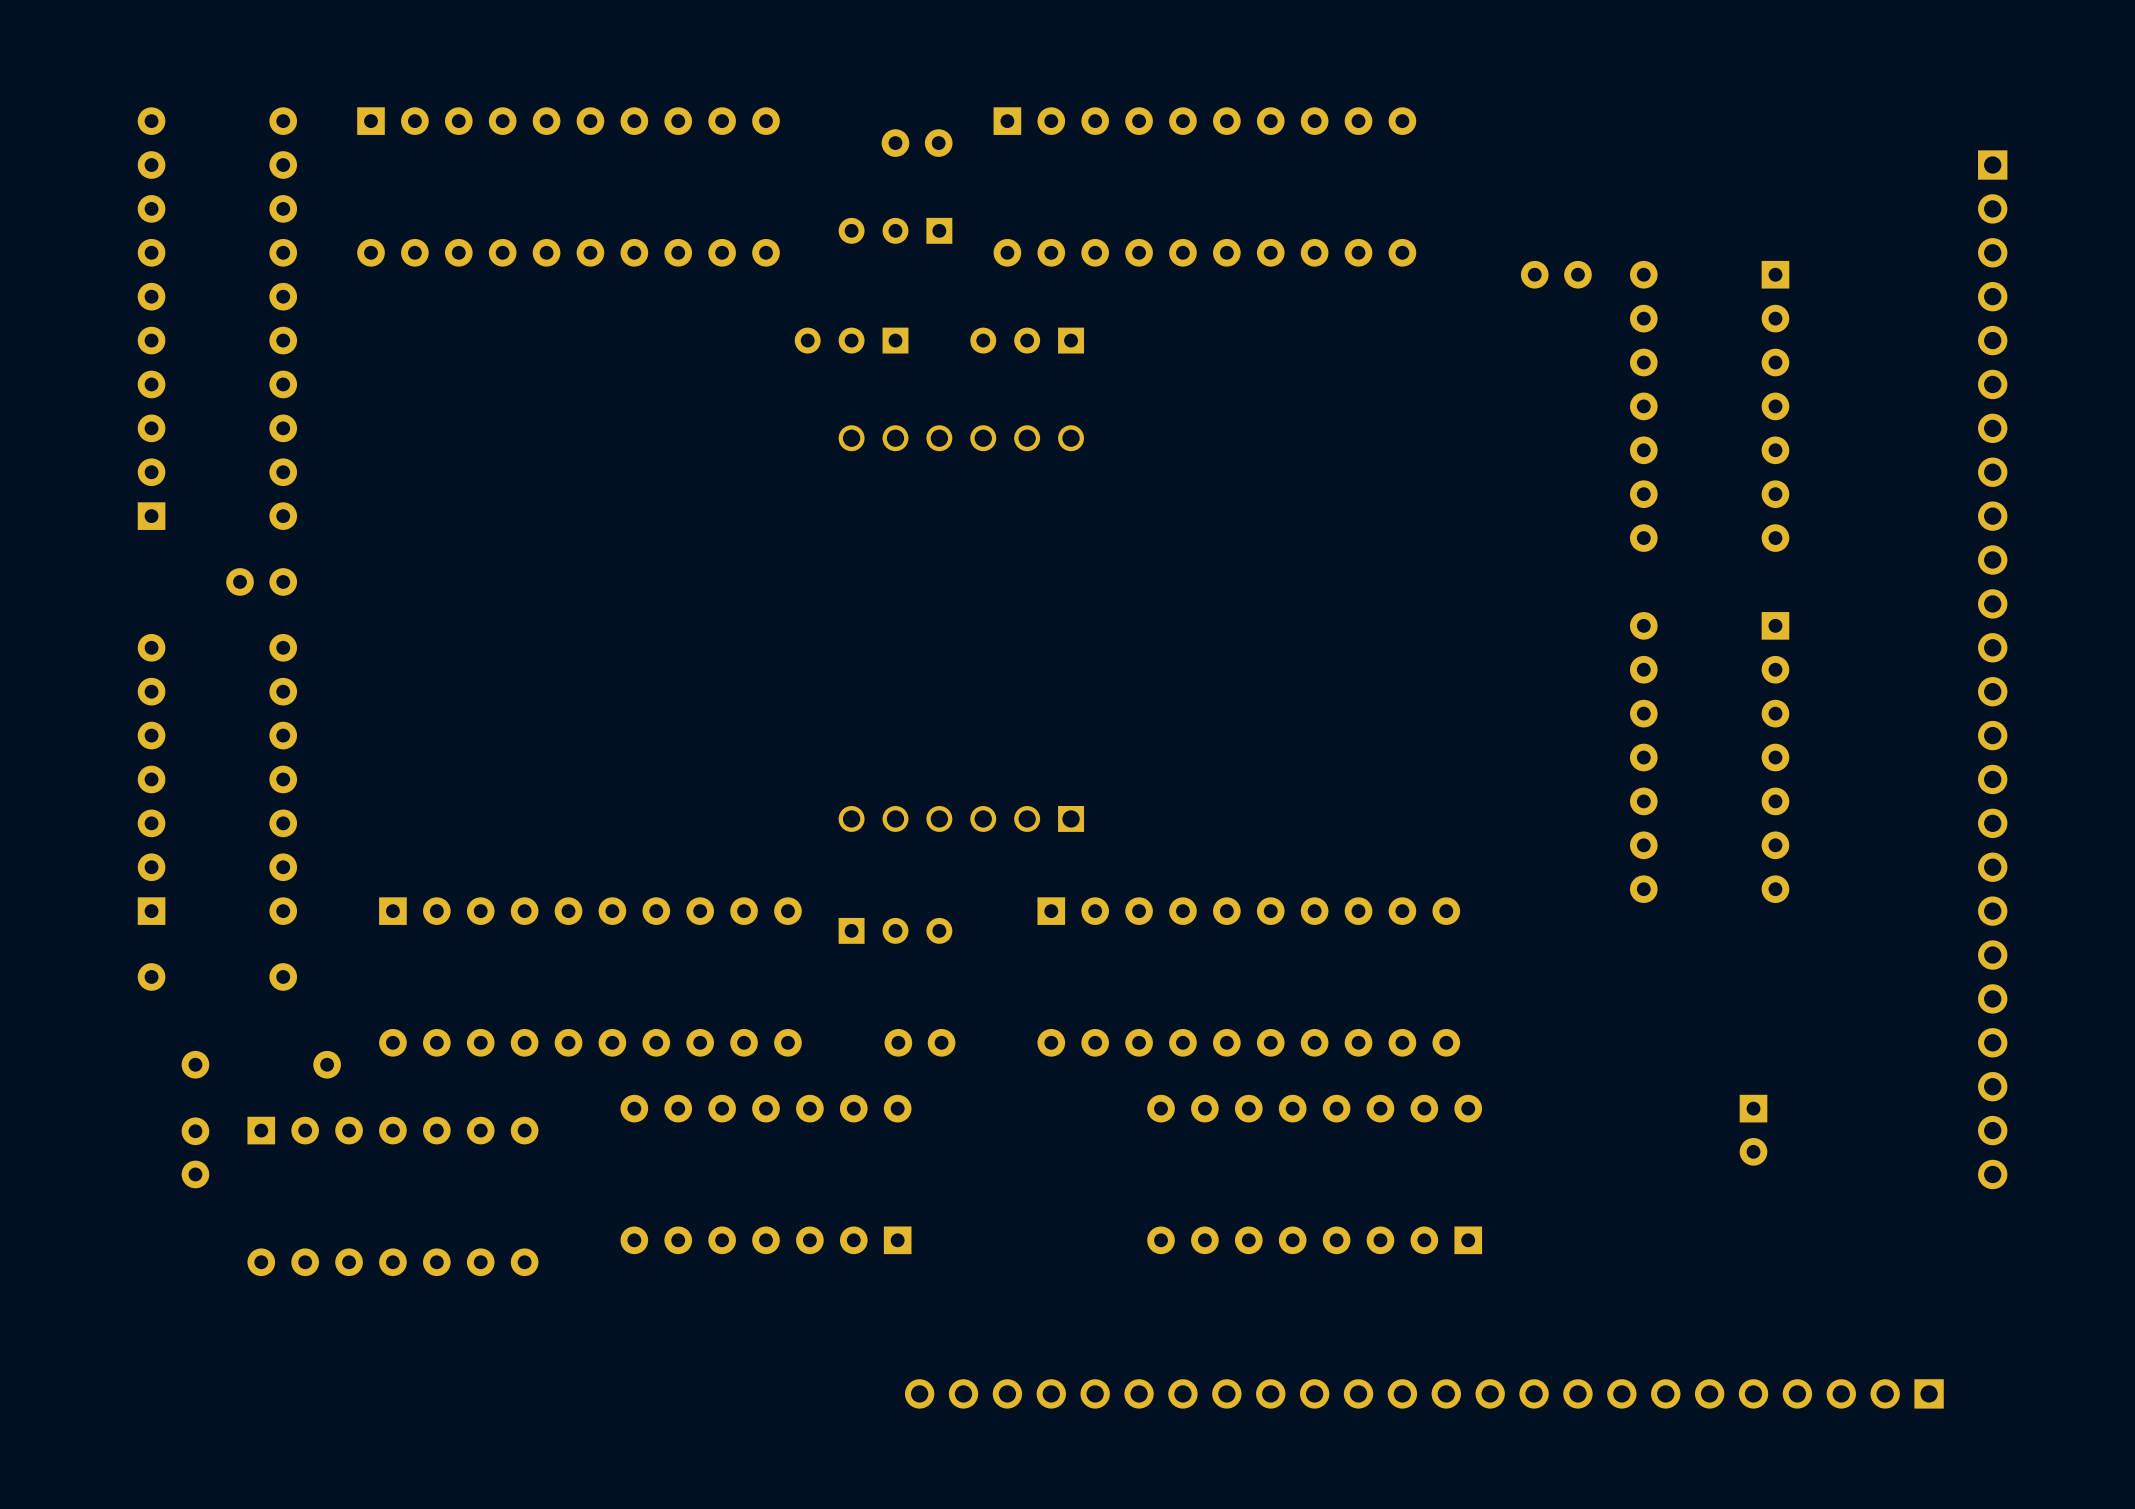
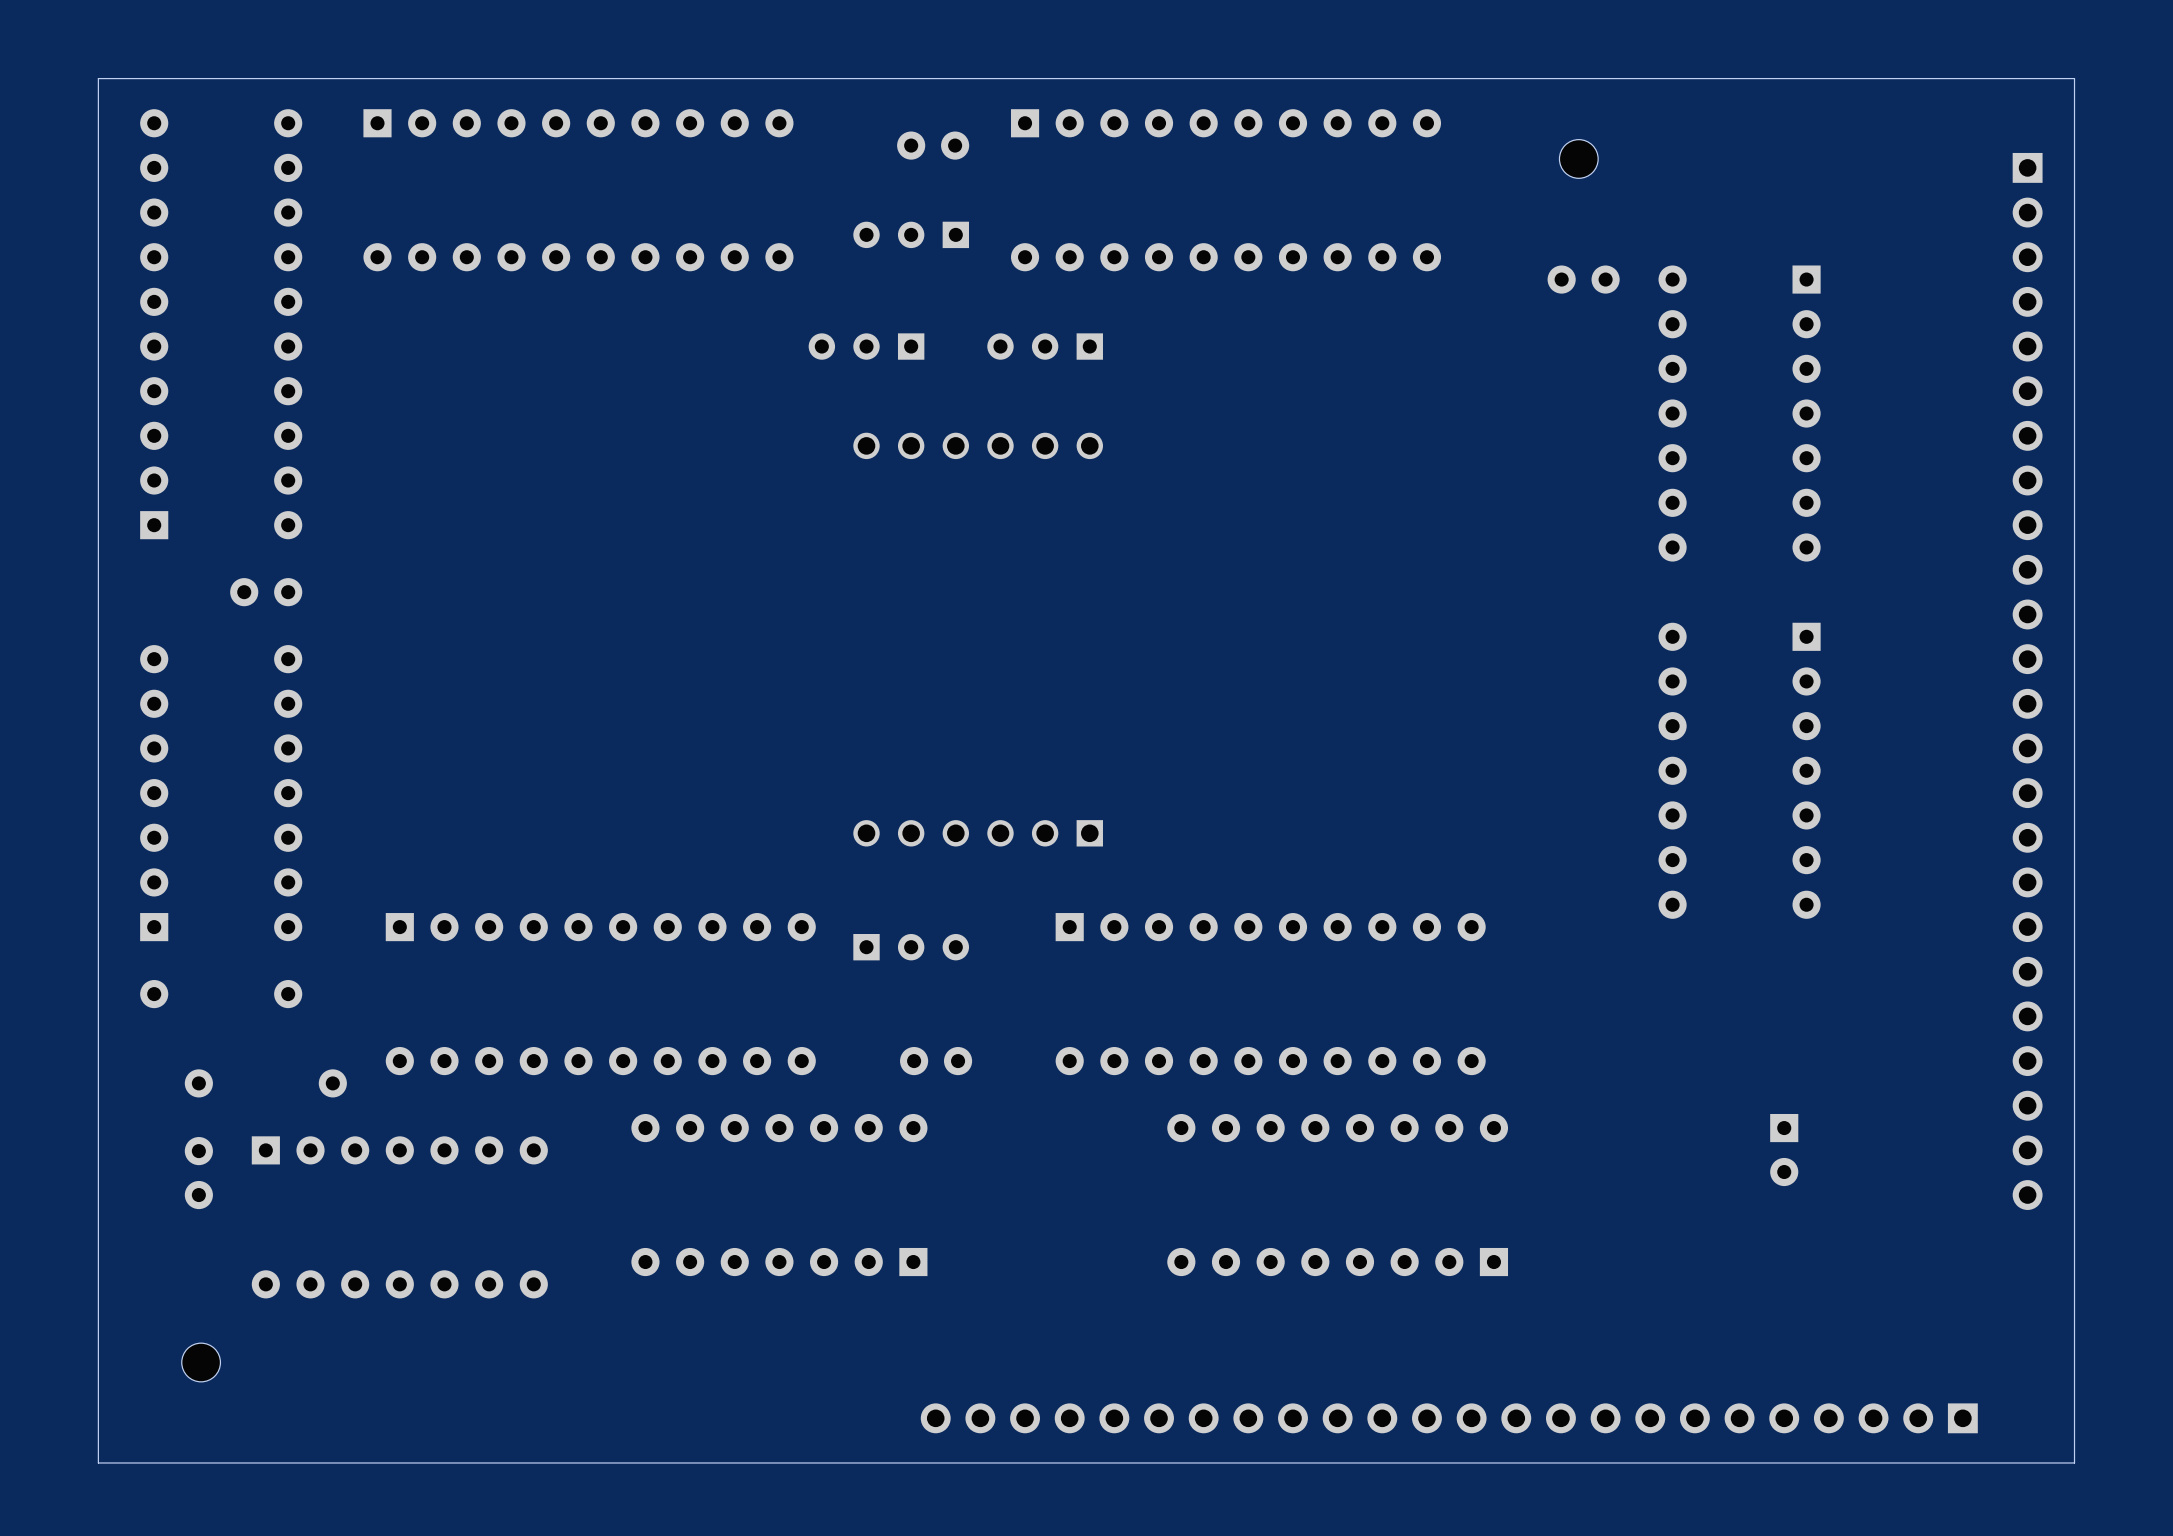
board edge: none -> (2074, 78) (2074, 1462) (98, 1462) (98, 78) (2074, 78)
part: none -> (1578, 158)
part: none -> (201, 1362)

